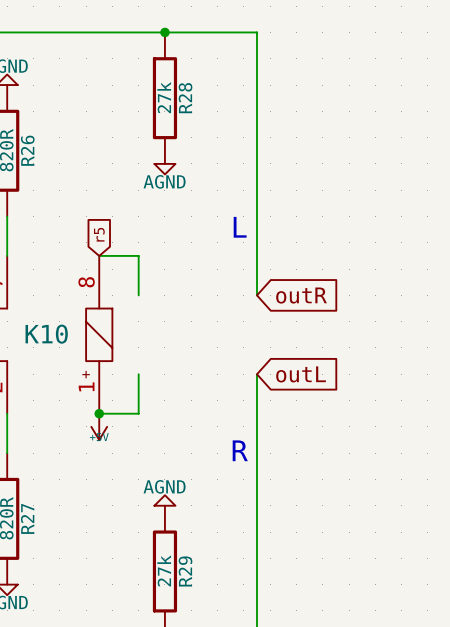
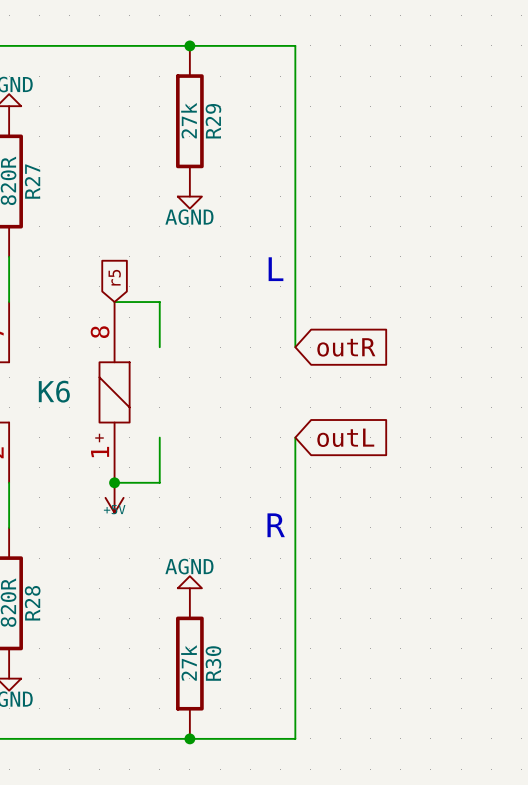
R28 name: R28 (185, 98) -> R29 (213, 121)
R26 name: R26 (27, 150) -> R27 (32, 181)
K10 name: K10 (46, 334) -> K6 (54, 391)
R27 name: R27 (27, 518) -> R28 (32, 603)
R29 name: R29 (185, 571) -> R30 (213, 663)

